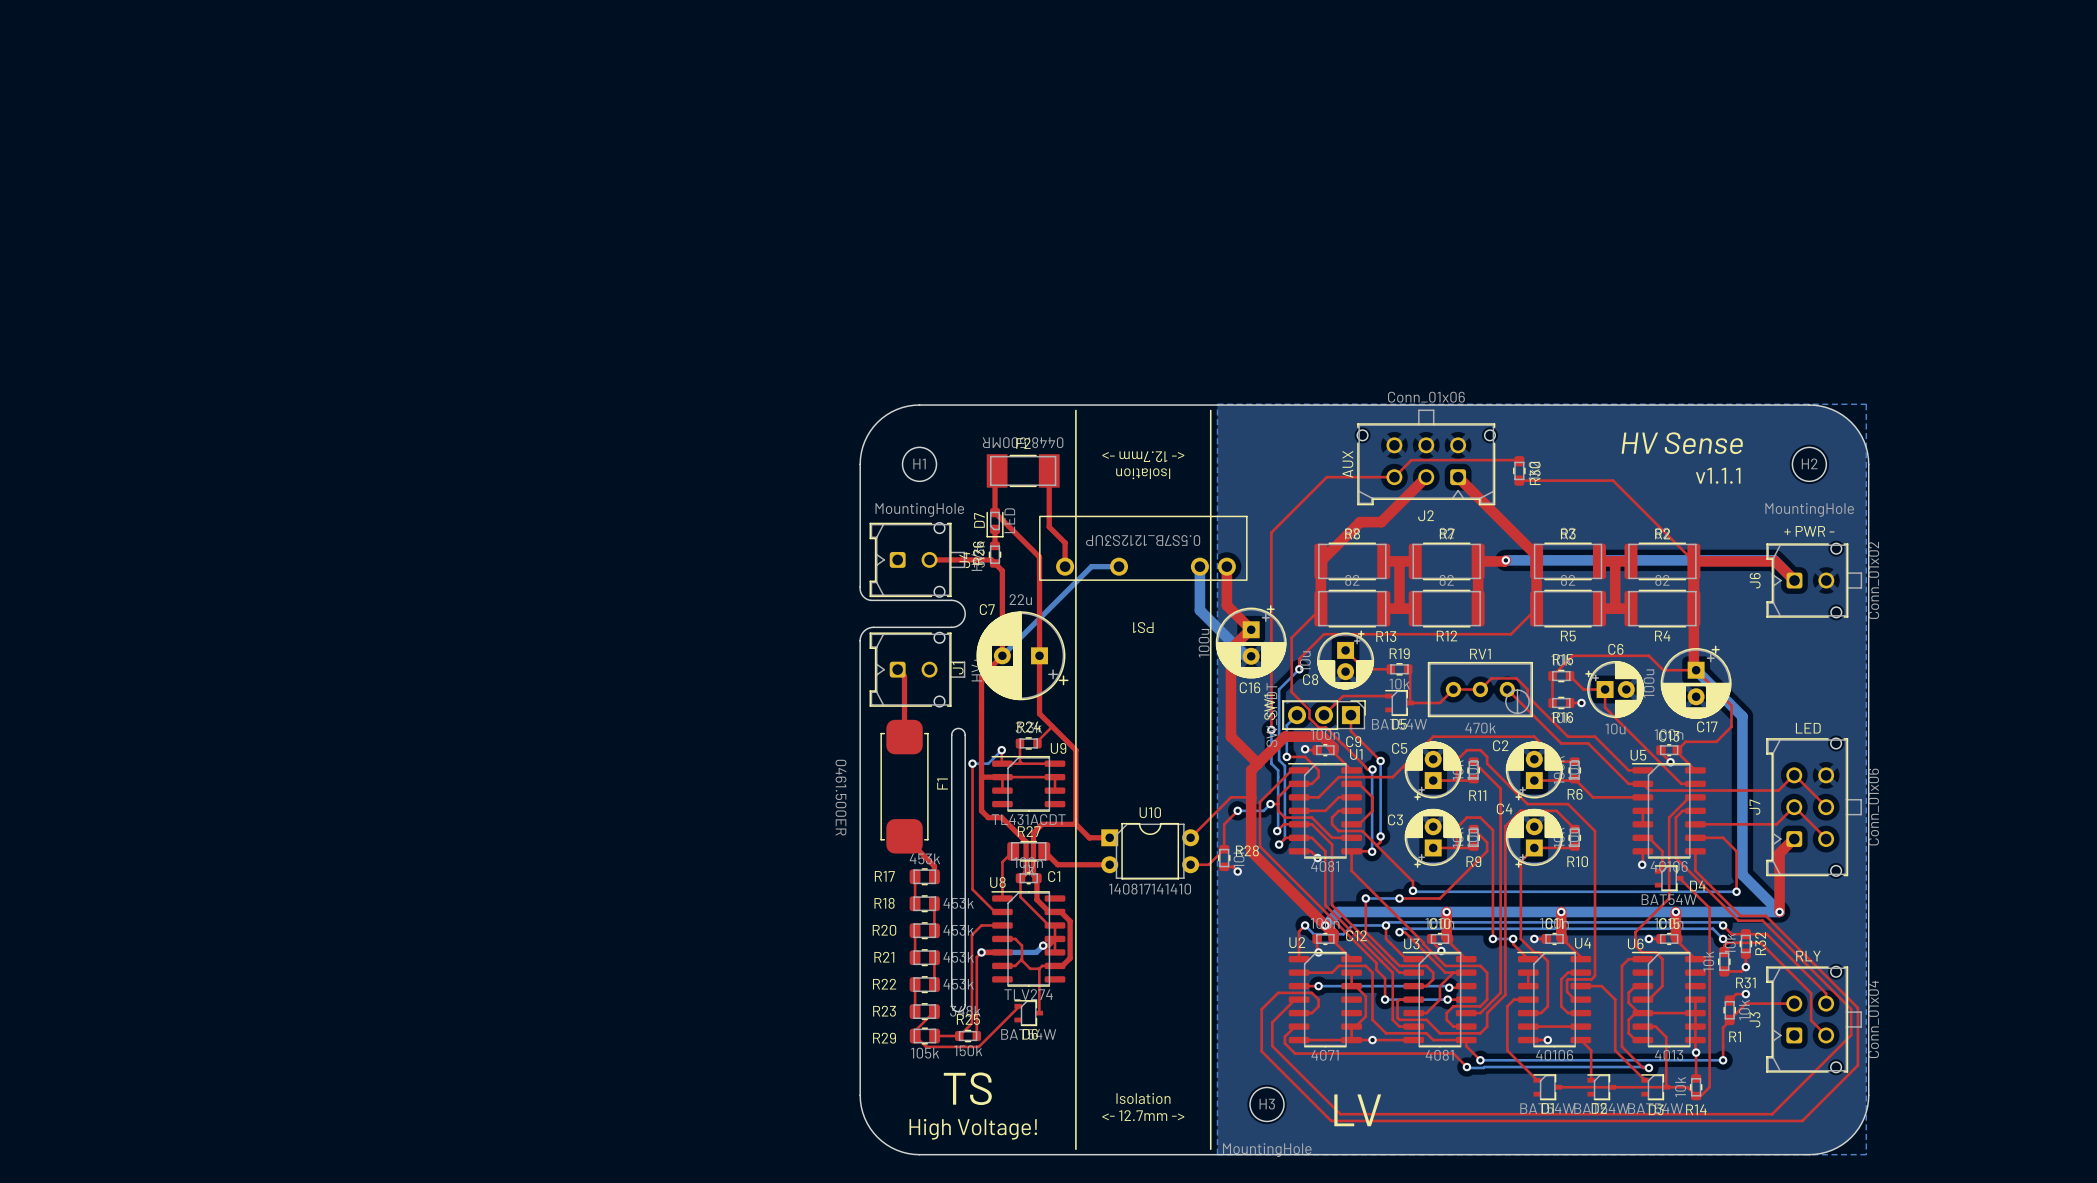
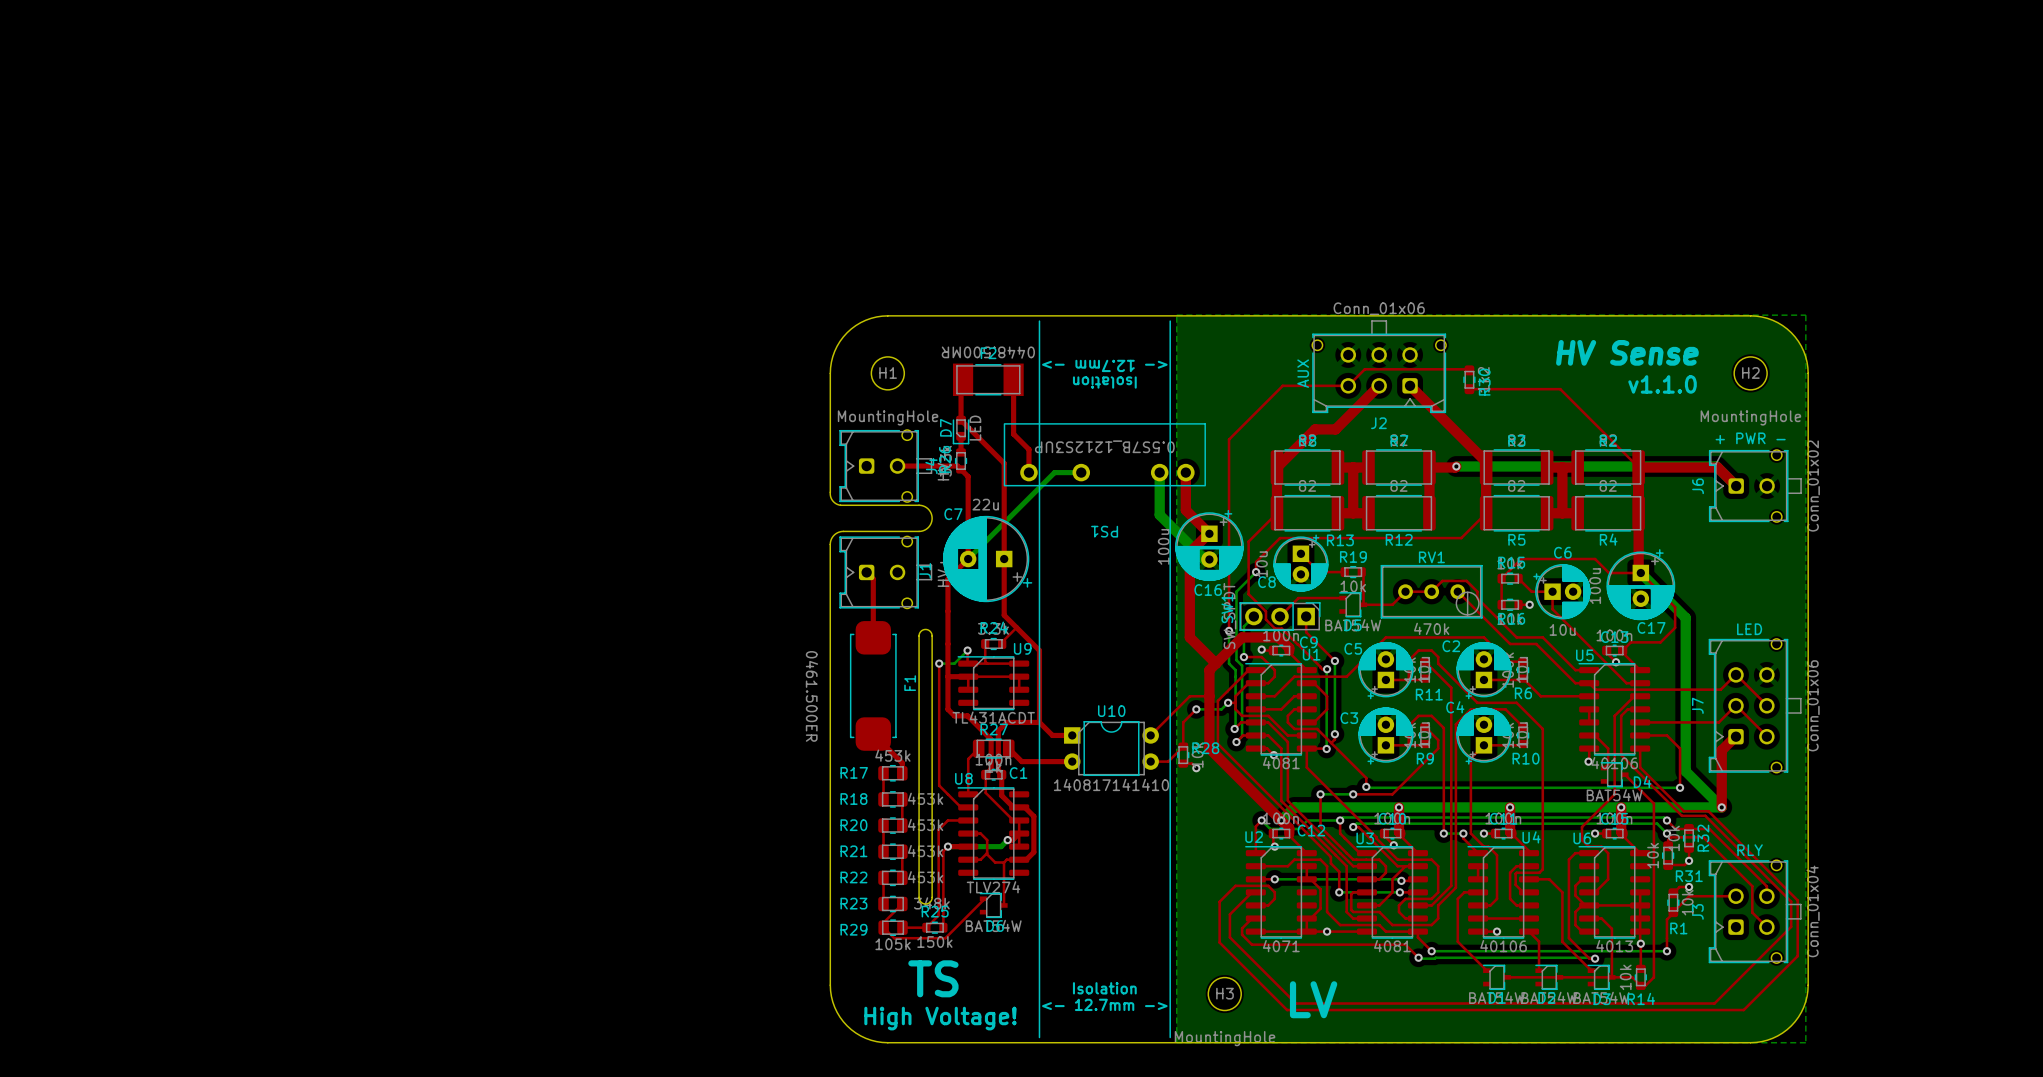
text: v1.1.1 (1718, 475) -> v1.1.0 (1662, 384)

